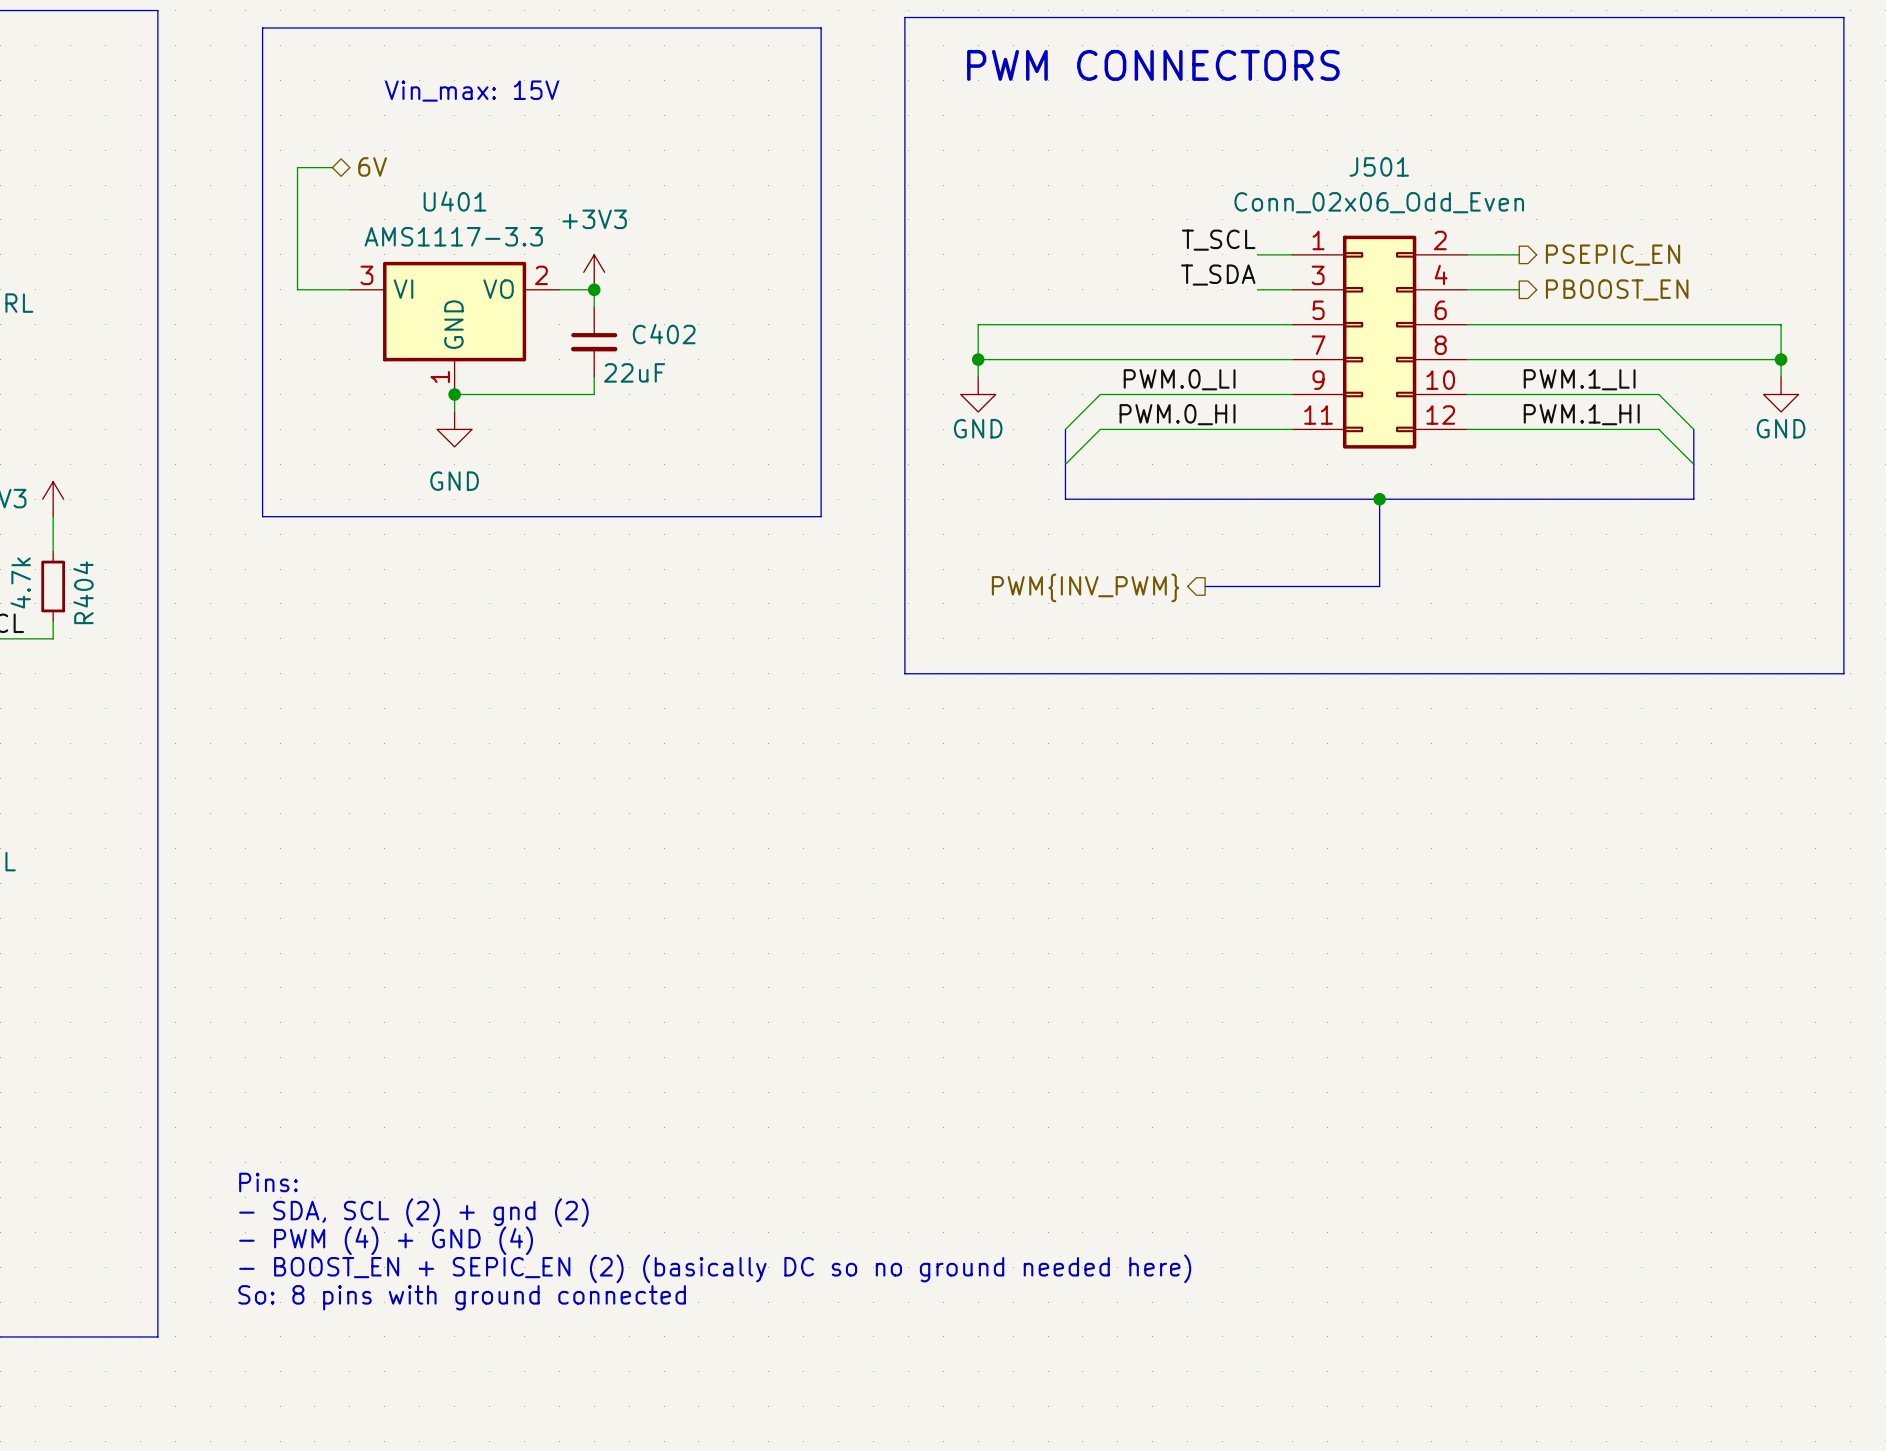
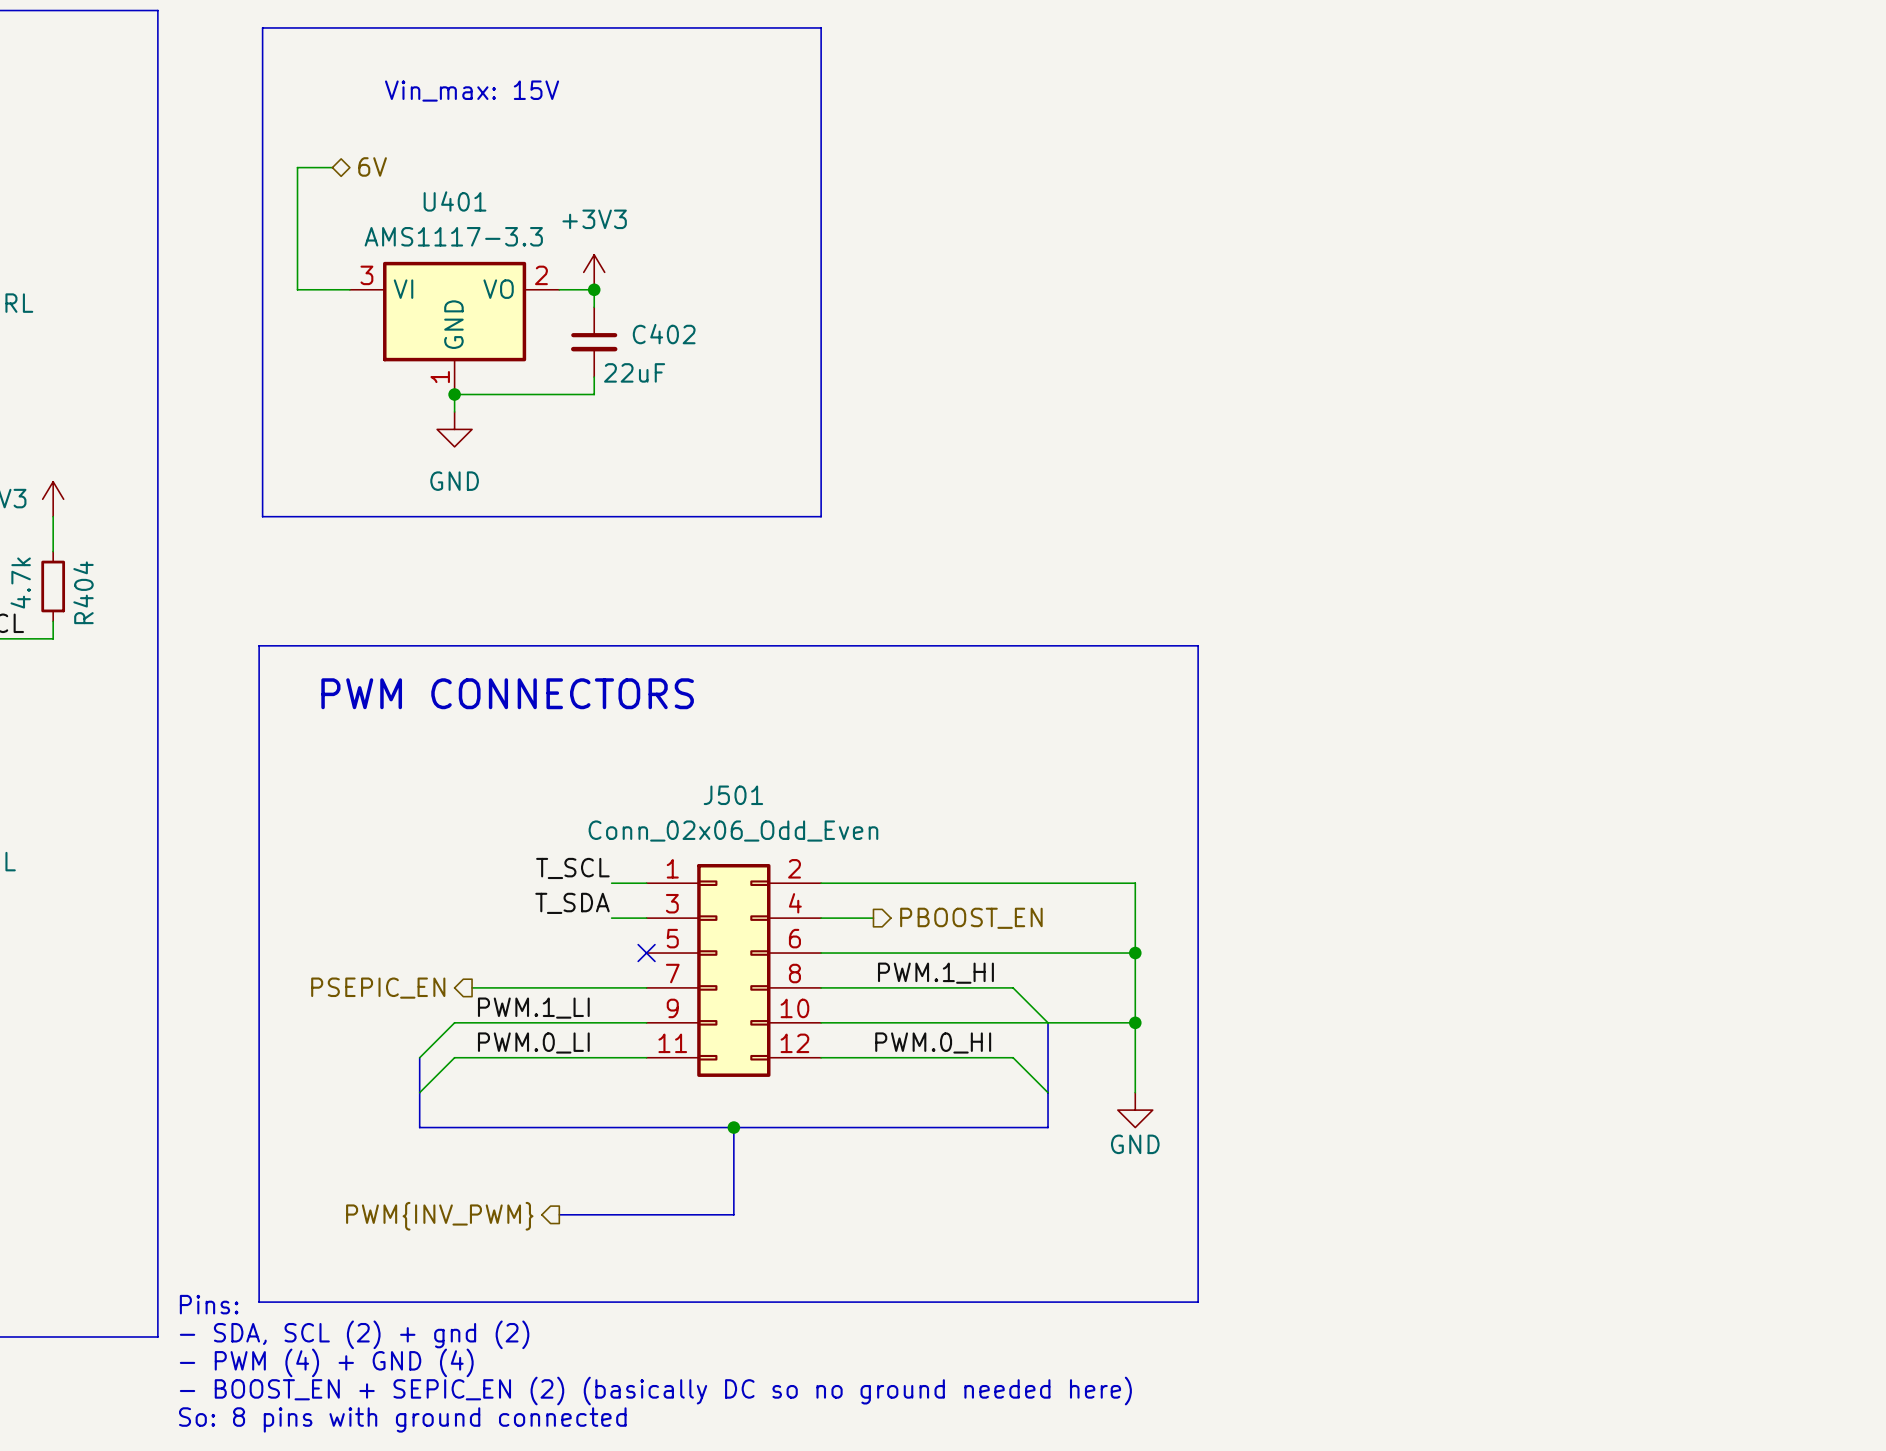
line: (904, 17) (1843, 17) (1843, 673) (904, 673) (904, 17) -> none
text: PWM CONNECTORS (1153, 65) -> none
label: T_SCL (1218, 240) -> none
wire: (1257, 254) (1292, 254) -> none
wire: (1466, 254) (1519, 254) -> none
hierarchical label: PSEPIC_EN (1613, 255) -> none
label: T_SDA (1218, 275) -> none
wire: (1257, 289) (1292, 289) -> none
wire: (1466, 289) (1519, 289) -> none
hierarchical label: PBOOST_EN (1617, 289) -> none
wire: (1292, 324) (978, 324) (978, 377) -> none
wire: (1466, 324) (1781, 324) (1781, 377) -> none
J501 position: (1379, 342) -> (733, 970)
wire: (978, 359) (1292, 359) -> none
junction: (978, 359) -> none
wire: (1466, 359) (1781, 359) -> none
junction: (1781, 359) -> none
label: PWM.0_LI (1179, 379) -> none
label: PWM.1_LI (1579, 379) -> none
power symbol: GND (978, 394) -> none
wire: (1292, 394) (1100, 394) (1065, 429) -> none
wire: (1466, 394) (1658, 394) (1693, 429) -> none
power symbol: GND (1781, 394) -> none
label: PWM.0_HI (1177, 414) -> none
label: PWM.1_HI (1581, 414) -> none
bus: (1065, 429) (1065, 499) (1693, 499) (1693, 429) -> none
wire: (1292, 429) (1100, 429) (1065, 464) -> none
wire: (1466, 429) (1658, 429) (1693, 464) -> none
bus: (1379, 499) (1379, 586) (1205, 586) -> none
junction: (1379, 499) -> none
hierarchical label: PWM{INV_PWM} (1085, 587) -> none
line: none -> (259, 645) (1198, 645) (1198, 1302) (259, 1302) (259, 645)
text: none -> PWM CONNECTORS (507, 693)
label: none -> T_SCL (572, 868)
wire: none -> (611, 883) (646, 883)
wire: none -> (821, 883) (1135, 883) (1135, 1092)
label: none -> T_SDA (572, 903)
wire: none -> (611, 918) (646, 918)
wire: none -> (821, 918) (873, 918)
hierarchical label: none -> PBOOST_EN (971, 918)
no-connect mark: none -> (646, 953)
wire: none -> (821, 953) (1135, 953)
junction: none -> (1135, 953)
label: none -> PWM.1_HI (935, 973)
wire: none -> (472, 987) (646, 987)
wire: none -> (821, 987) (1013, 987) (1048, 1022)
hierarchical label: none -> PSEPIC_EN (378, 988)
label: none -> PWM.1_LI (533, 1008)
wire: none -> (646, 1022) (454, 1022) (419, 1057)
wire: none -> (821, 1022) (1135, 1022)
bus: none -> (1048, 1022) (1048, 1127) (419, 1127) (419, 1057)
junction: none -> (1135, 1022)
label: none -> PWM.0_LI (533, 1042)
label: none -> PWM.0_HI (933, 1042)
wire: none -> (646, 1057) (454, 1057) (419, 1092)
wire: none -> (821, 1057) (1013, 1057) (1048, 1092)
power symbol: none -> GND (1135, 1110)
bus: none -> (733, 1127) (733, 1214) (559, 1214)
junction: none -> (733, 1127)
text position: Pins: (268, 1182) -> Pins: (209, 1304)
text position: - SDA, SCL (2) + gnd (2) (413, 1212) -> - SDA, SCL (2) + gnd (2) (354, 1334)
hierarchical label: none -> PWM{INV_PWM} (439, 1216)
text position: - PWM (4) + GND (4) (386, 1240) -> - PWM (4) + GND (4) (326, 1362)
text position: - BOOST_EN + SEPIC_EN (2) (basically DC so no ground needed here) (715, 1268) -> - BOOST_EN + SEPIC_EN (2) (basically DC so no ground needed here) (655, 1391)
text position: So: 8 pins with ground connected (462, 1297) -> So: 8 pins with ground connected (402, 1419)

